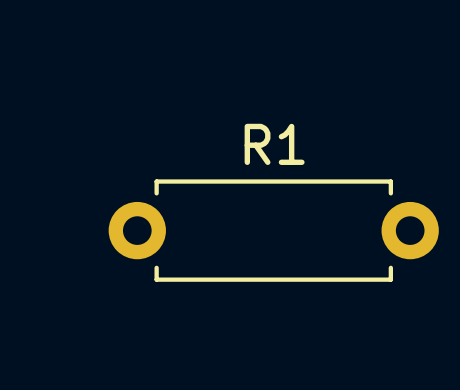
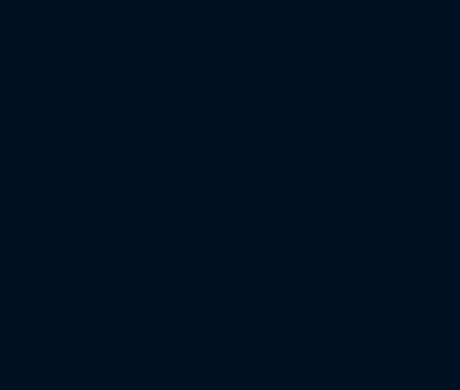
R1: (273, 230) -> none

